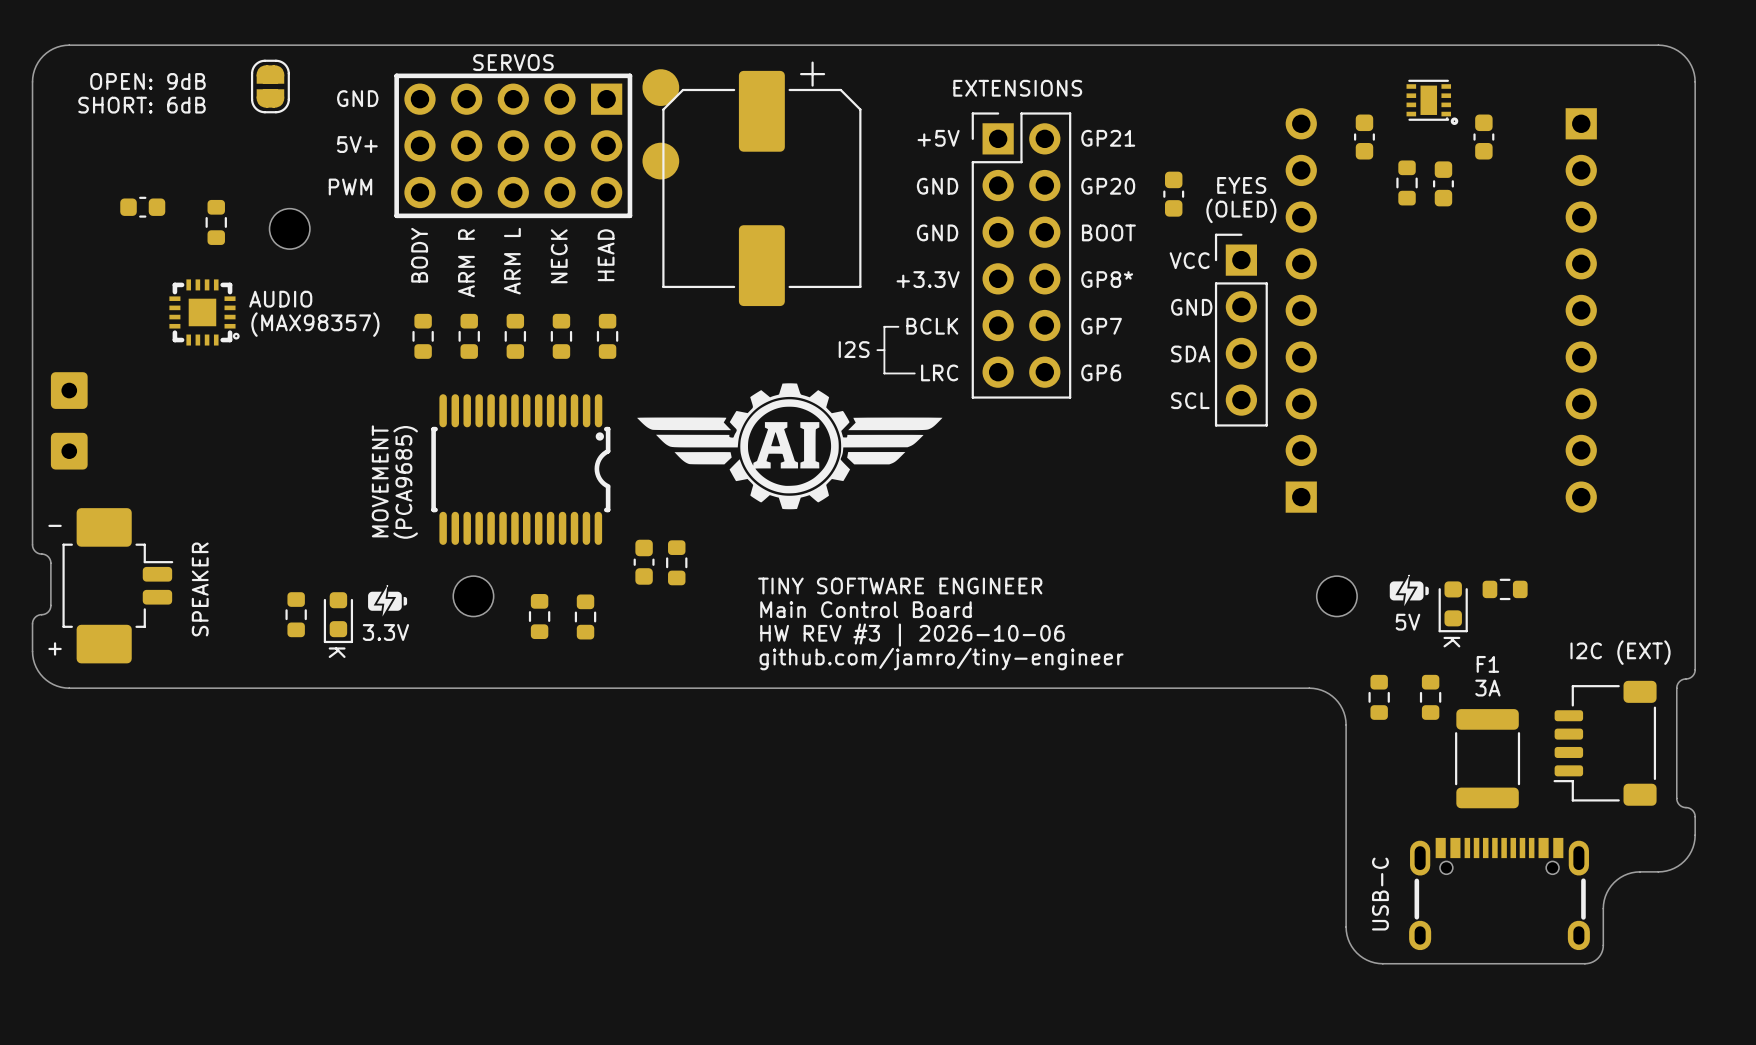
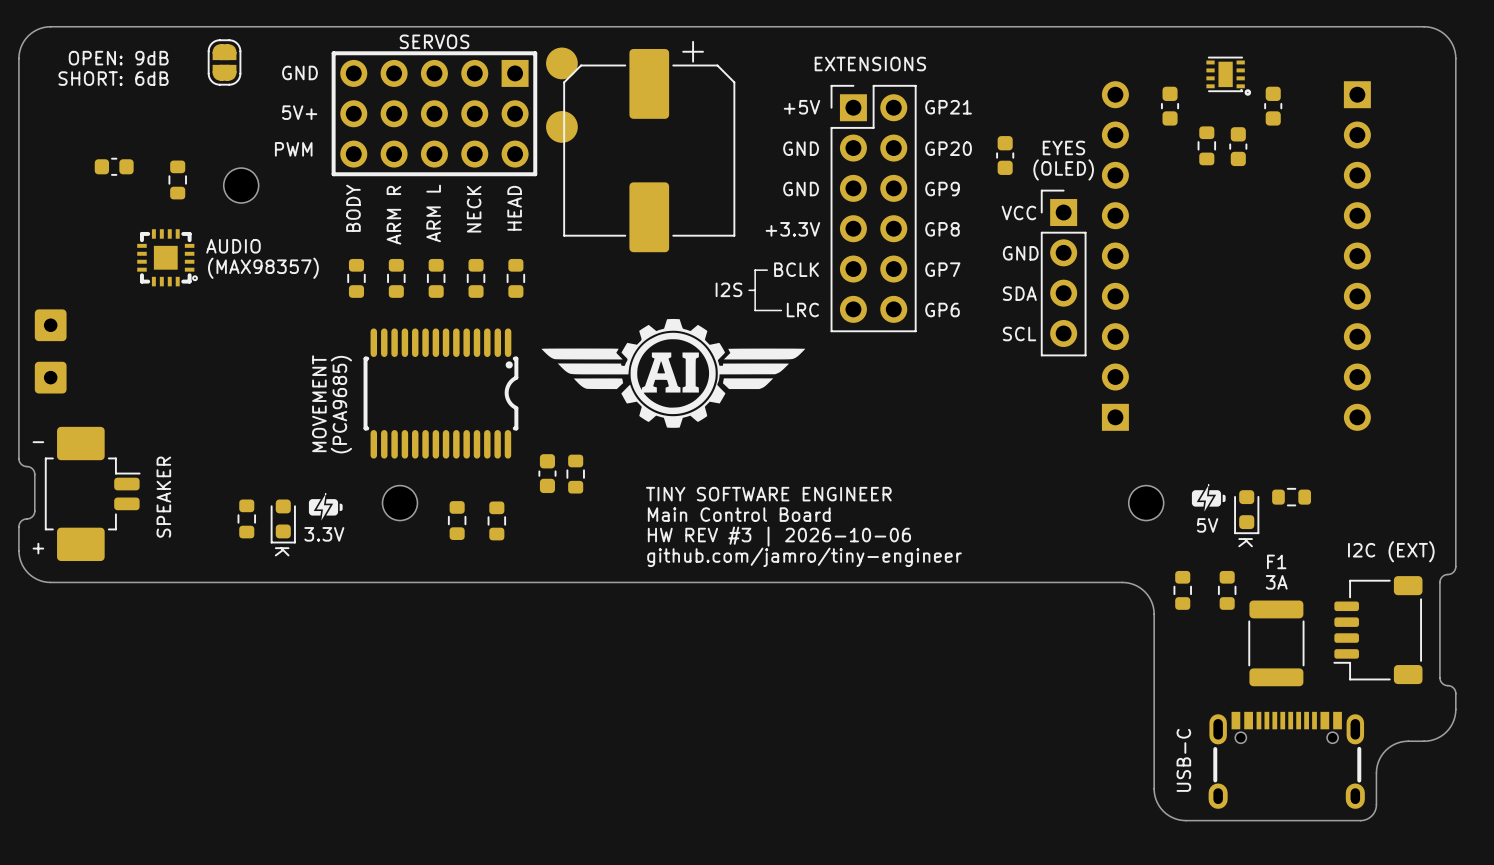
text: BOOT (1108, 232) -> GP9 (942, 189)
text: GP8* (1107, 279) -> GP8 (942, 229)

